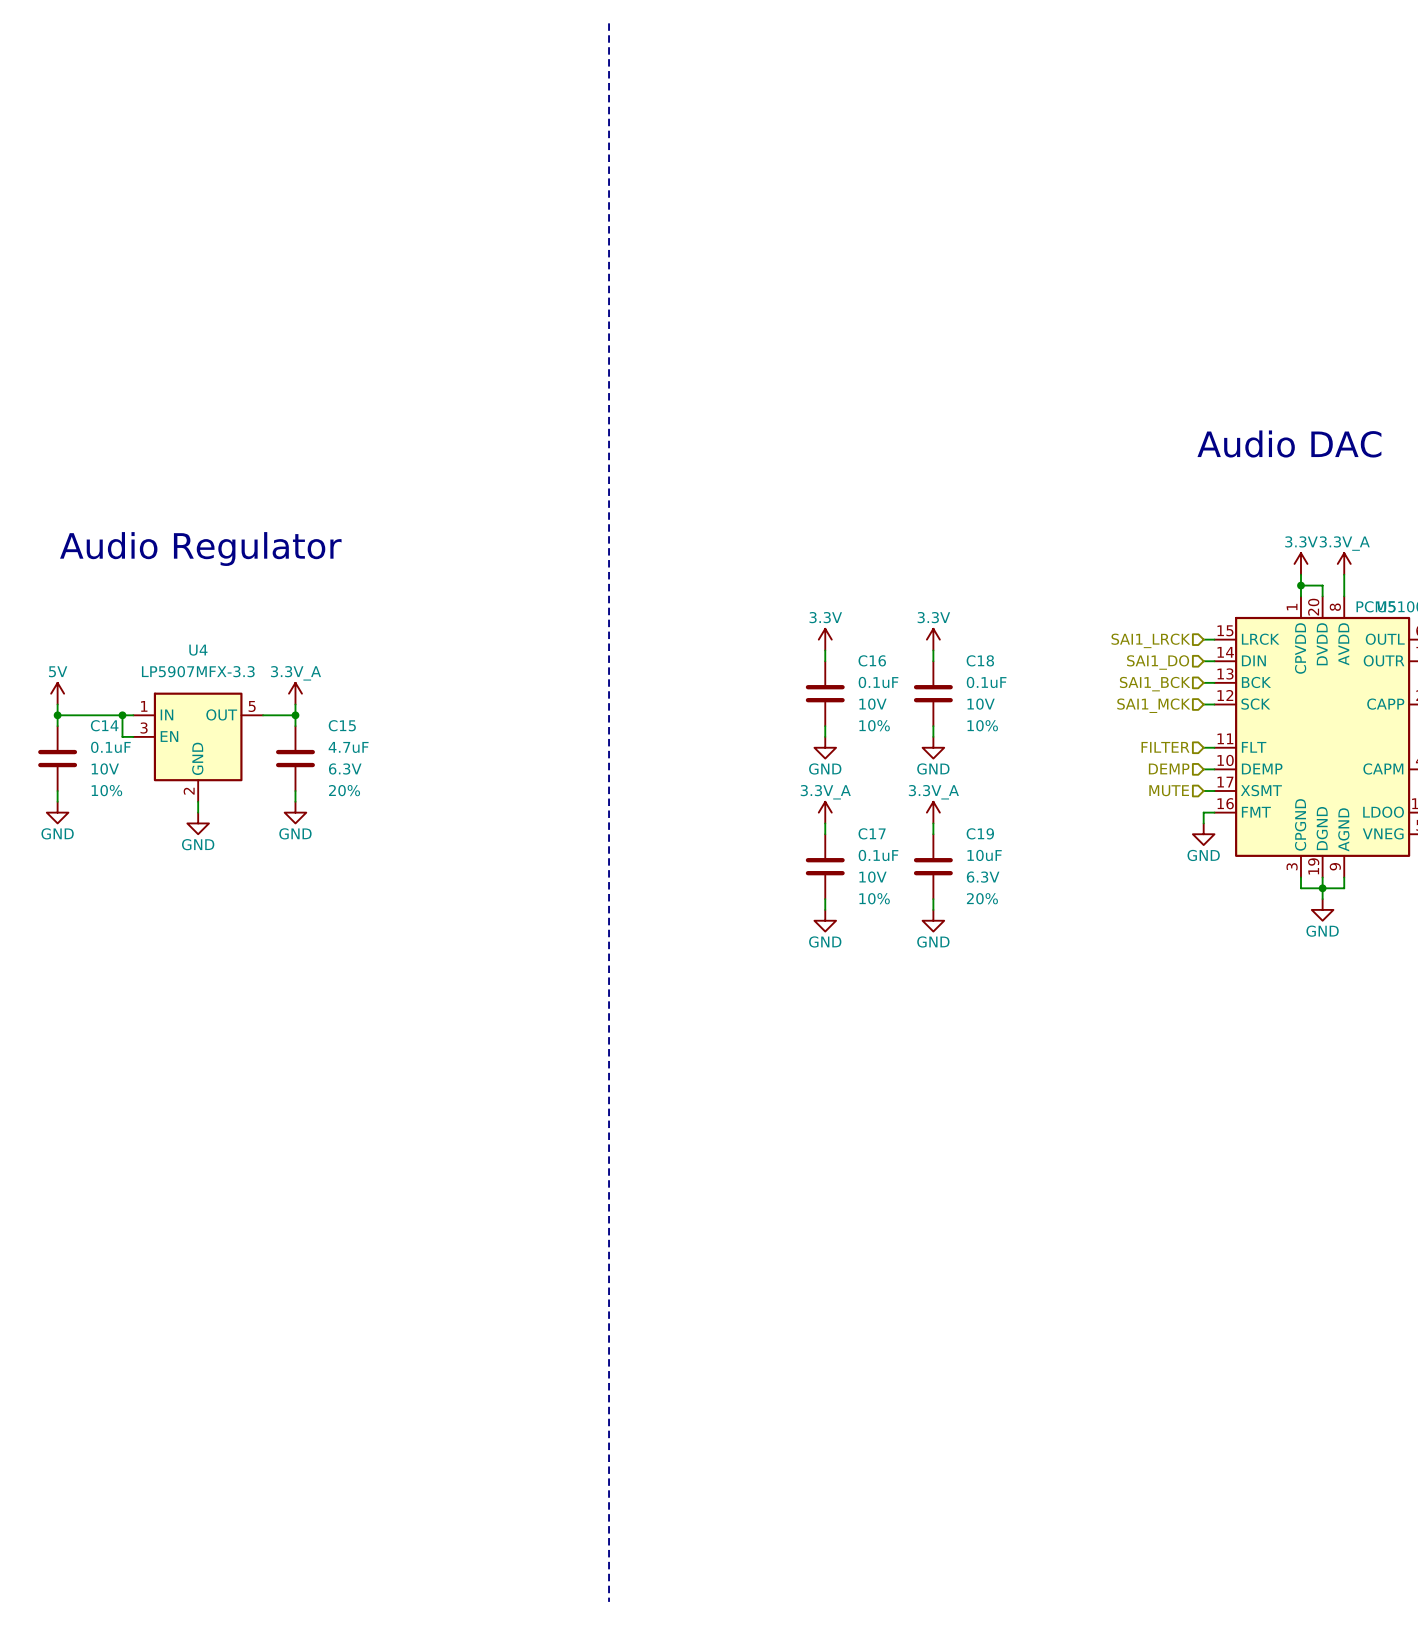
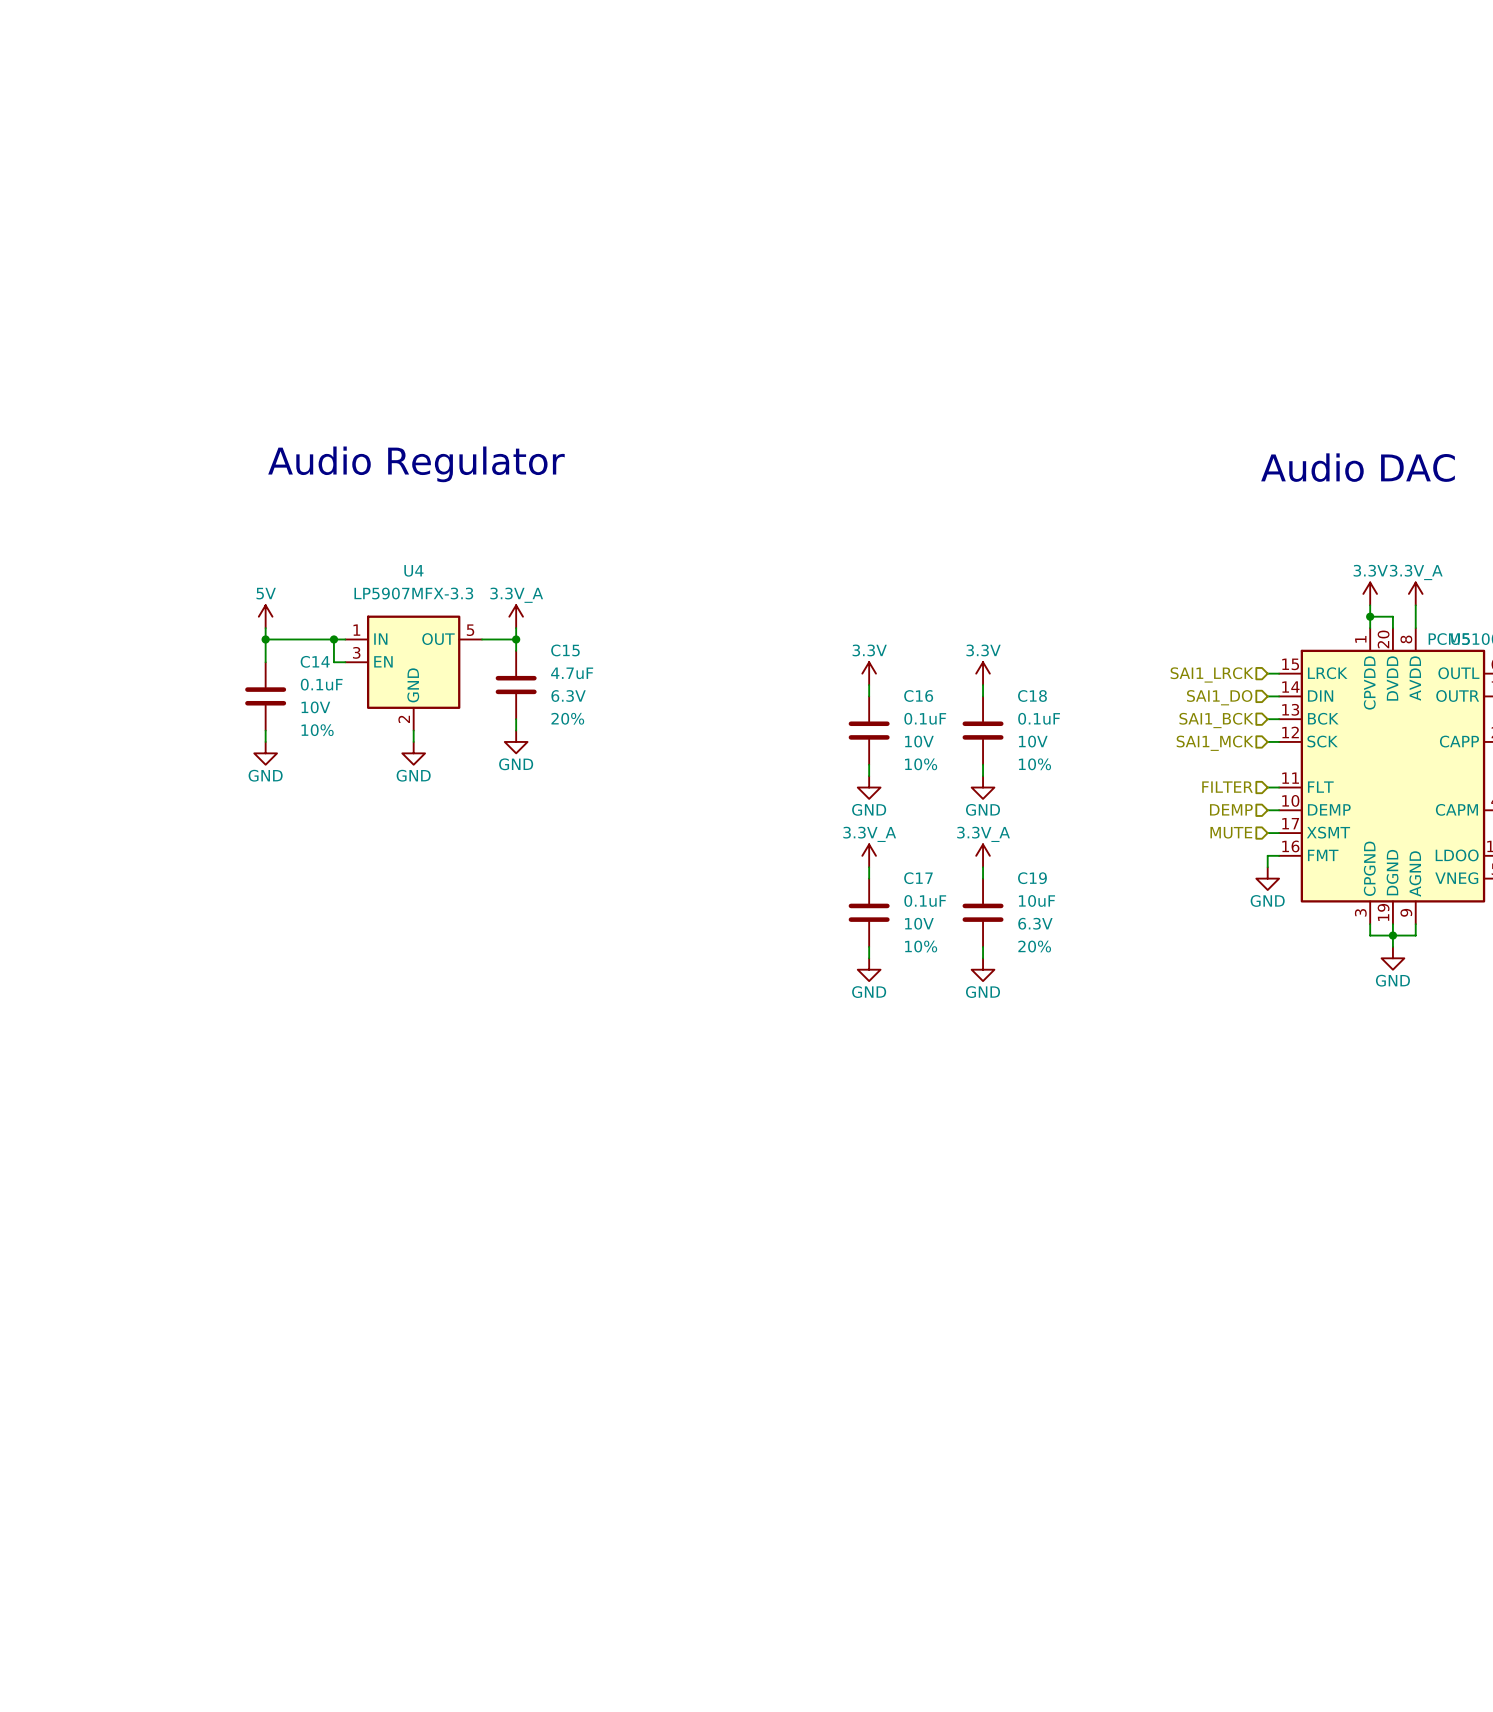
line: (609, 23) (609, 1601) -> none
text: none -> Audio Regulator (416, 464)
text: Audio Regulator (200, 549) -> none
power symbol: none -> 5V (265, 616)
power symbol: none -> 3.3V_A (516, 616)
wire: none -> (265, 628) (265, 662)
wire: none -> (516, 628) (516, 650)
wire: none -> (265, 639) (345, 639)
junction: none -> (265, 639)
wire: none -> (333, 639) (333, 662) (345, 662)
junction: none -> (333, 639)
wire: none -> (482, 639) (516, 639)
junction: none -> (516, 639)
wire: none -> (516, 719) (516, 730)
power symbol: 5V (57, 693) -> none
power symbol: 3.3V_A (295, 693) -> none
wire: none -> (413, 730) (413, 741)
wire: (57, 704) (57, 726) -> none
wire: (295, 704) (295, 726) -> none
power symbol: none -> GND (516, 741)
wire: (57, 715) (133, 715) -> none
junction: (57, 715) -> none
wire: (122, 715) (122, 736) (133, 736) -> none
junction: (122, 715) -> none
power symbol: none -> GND (265, 753)
wire: (263, 715) (295, 715) -> none
junction: (295, 715) -> none
power symbol: none -> GND (413, 753)
U4 position: (198, 747) -> (413, 673)
C14 position: (57, 758) -> (265, 696)
C15 position: (295, 758) -> (516, 685)
wire: (57, 790) (57, 801) -> none
wire: (295, 790) (295, 801) -> (265, 730) (265, 741)
wire: (198, 801) (198, 812) -> none
power symbol: GND (57, 812) -> none
power symbol: GND (295, 812) -> none
power symbol: GND (198, 823) -> none

